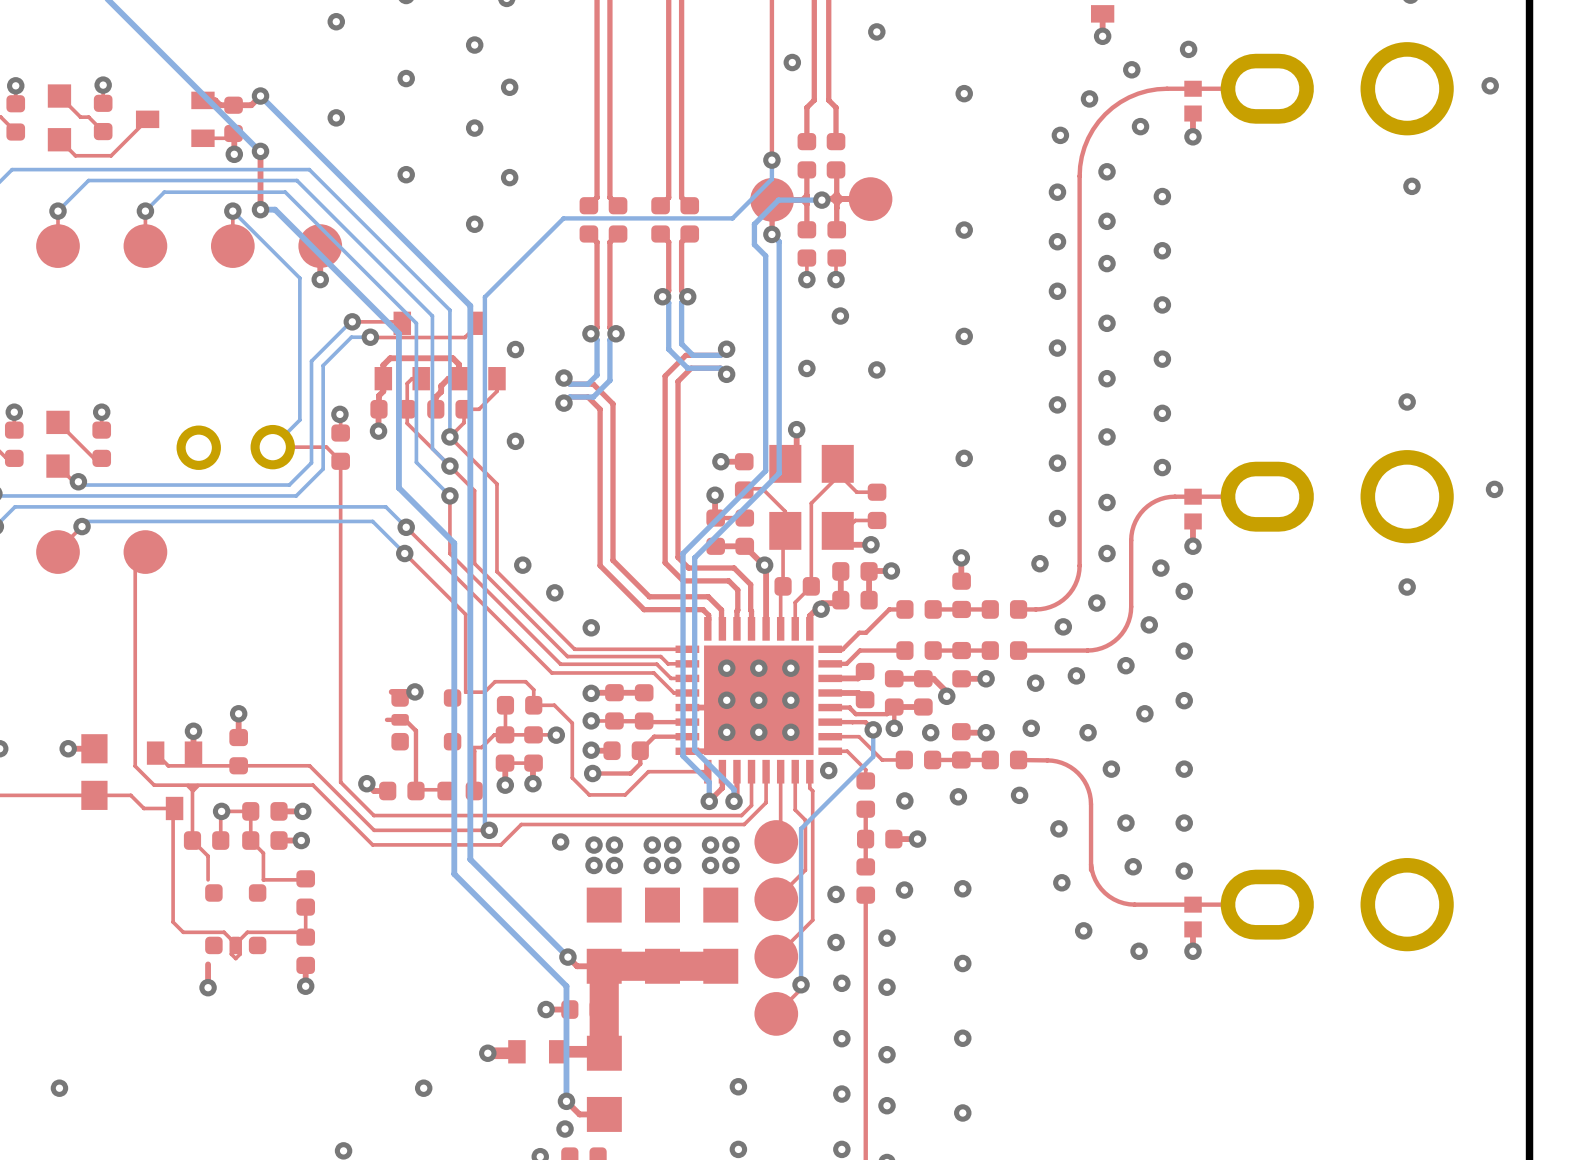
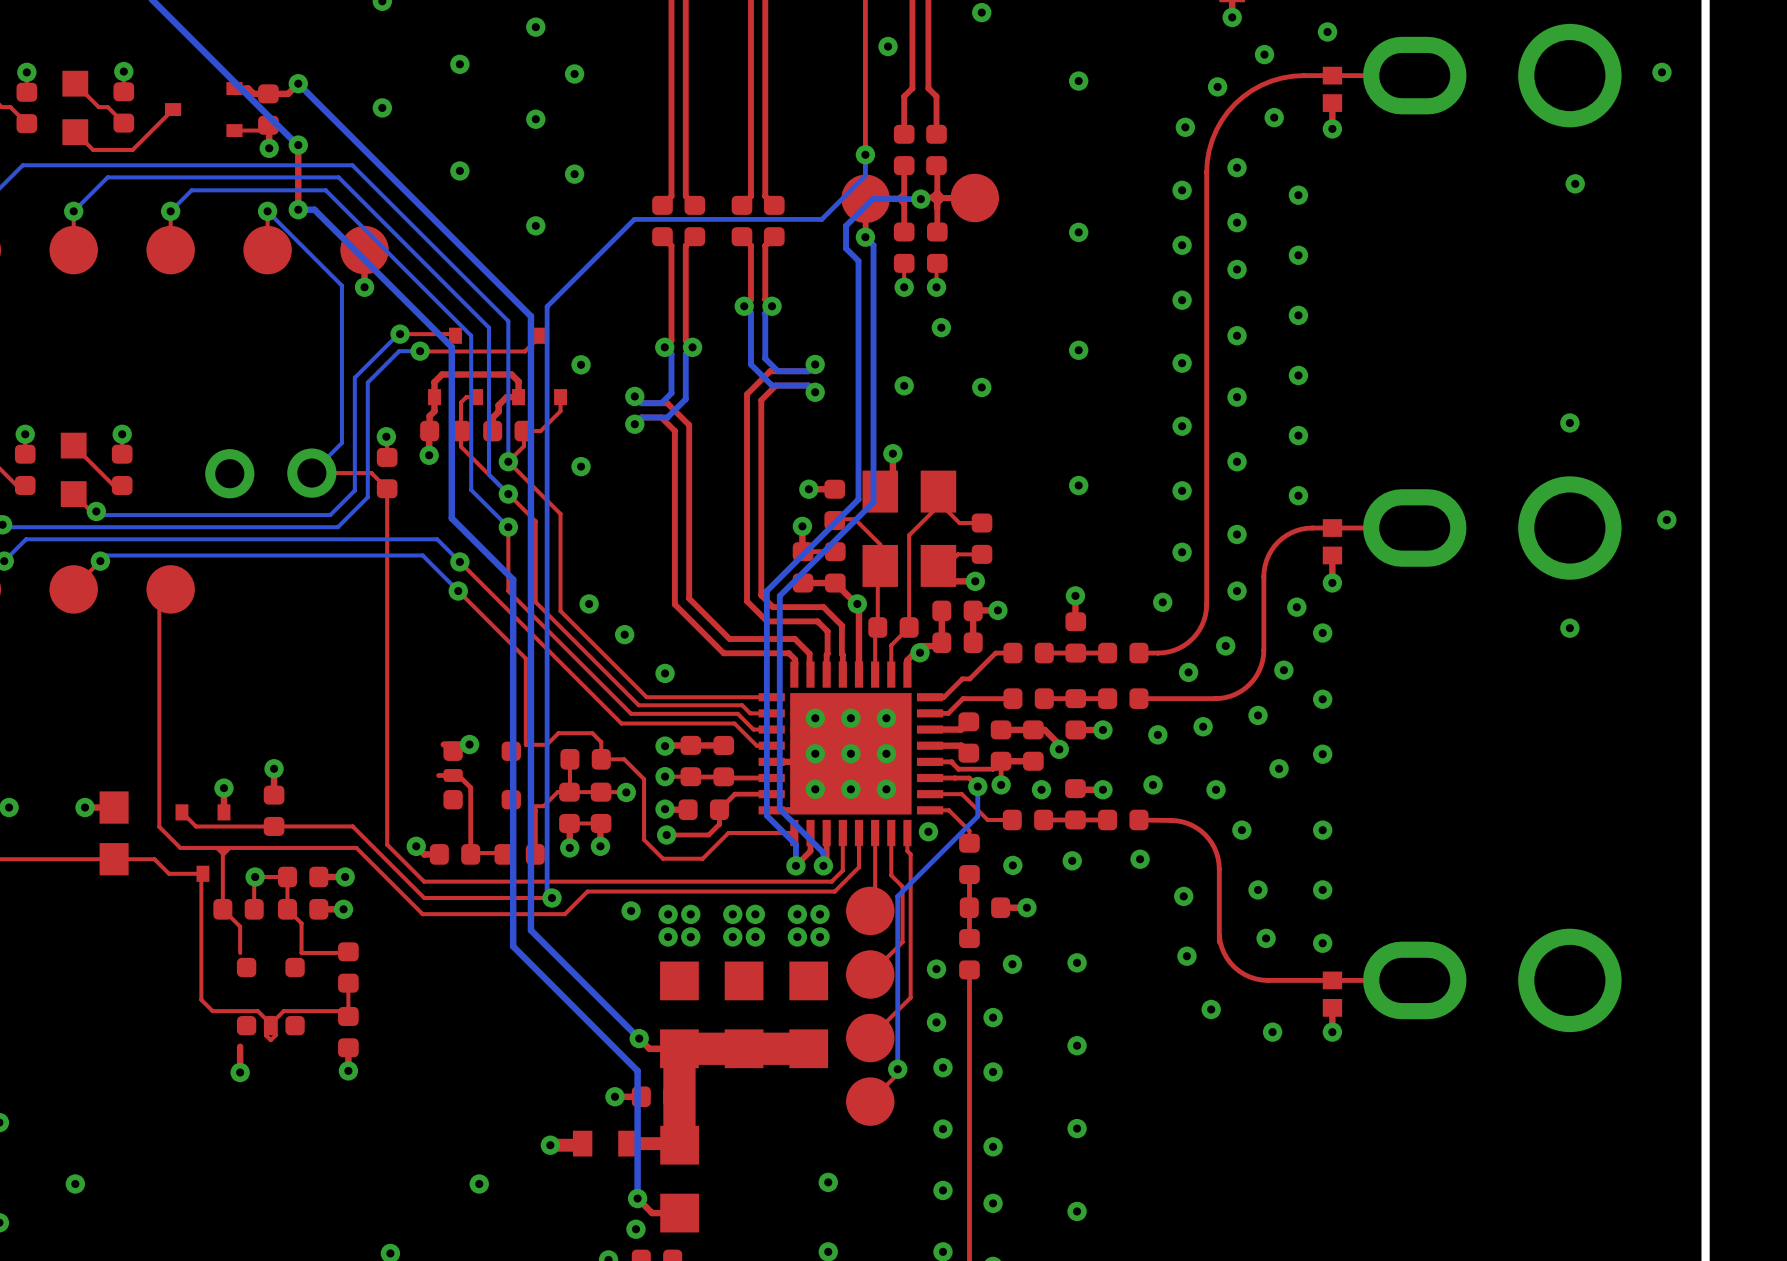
part footprint: [135, 91, 215, 148] -> [165, 82, 243, 138]
part footprint: [374, 311, 430, 391] -> [428, 327, 483, 406]
part footprint: [450, 311, 506, 391] -> [512, 327, 568, 406]
part footprint: [146, 741, 203, 821] -> [175, 804, 231, 882]

